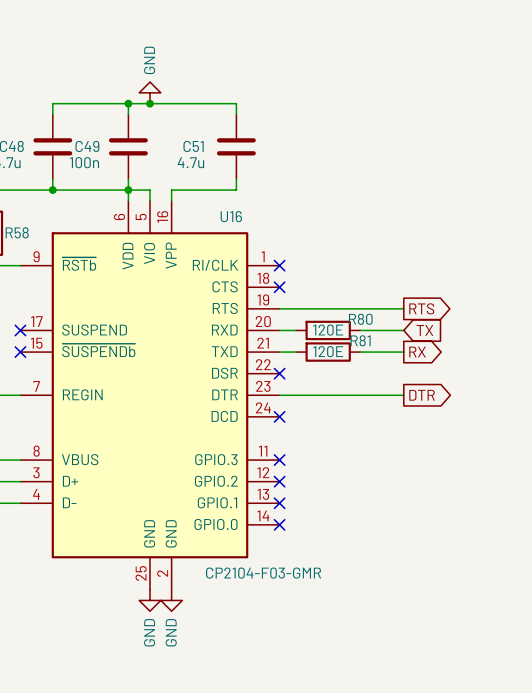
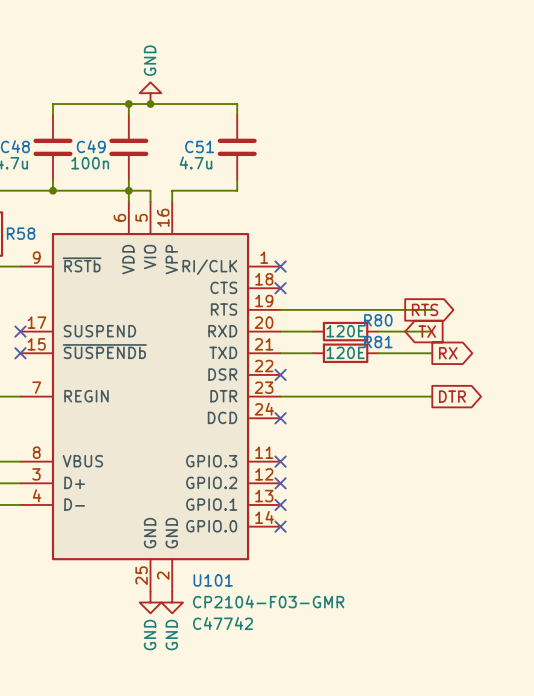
U16 name: U16 (231, 216) -> U101 (213, 580)
wire: none -> (405, 309) (432, 309)
R80 position: (328, 330) -> (345, 331)
wire: none -> (405, 331) (432, 331)
R81 position: (328, 352) -> (345, 353)
wire: none -> (405, 353) (432, 353)
global label position: RX (417, 352) -> RX (448, 353)
wire: none -> (405, 396) (432, 396)
global label position: DTR (422, 395) -> DTR (452, 396)
U16 value position: CP2104-F03-GMR (263, 573) -> CP2104-F03-GMR (268, 601)
U16 text: none -> C47742 (222, 623)

